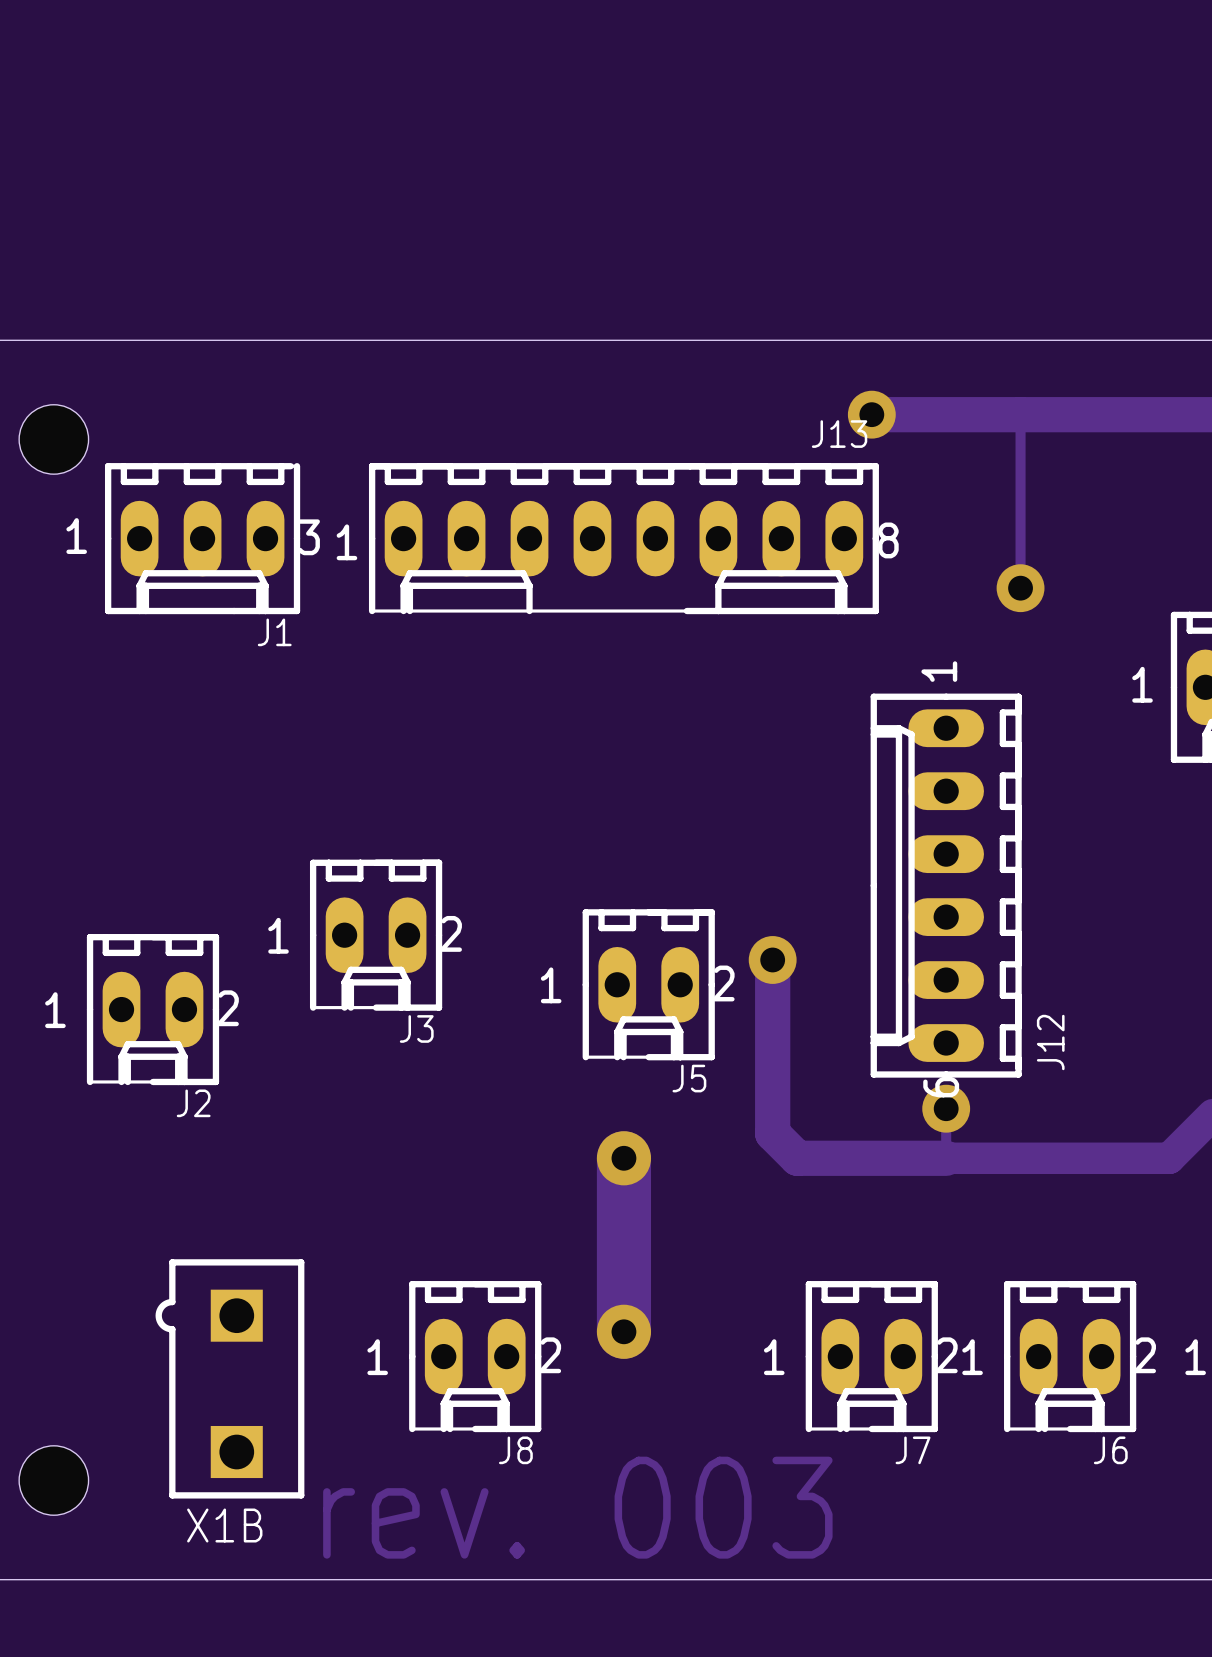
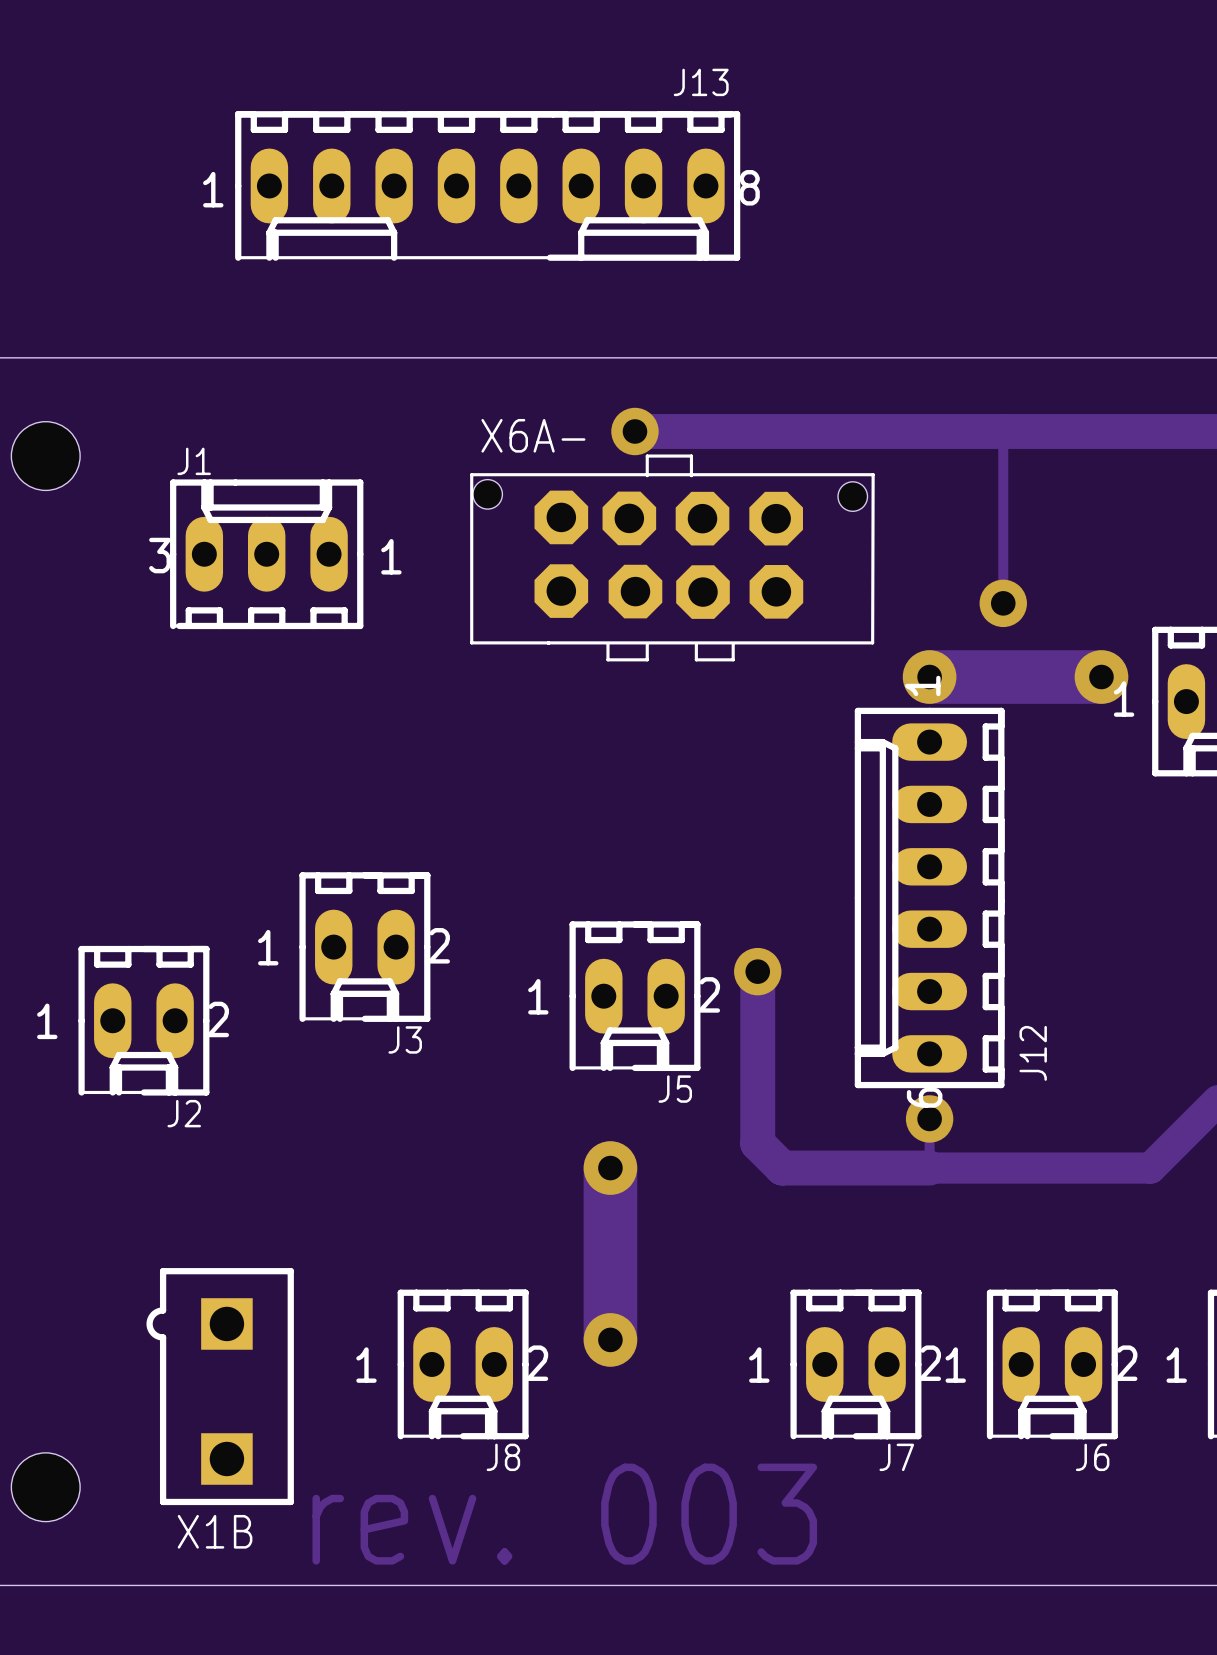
track: none -> (634, 431) (855, 431)
via: none -> (634, 431)
via: (871, 414) -> none
J1 footprint: [104, 463, 301, 615] -> [170, 479, 364, 630]
J13 position: (623, 538) -> (487, 185)
X6A-: none -> (672, 557)
J1 name position: J1 (274, 632) -> J1 (194, 461)
track: none -> (929, 677) (1101, 677)
via: none -> (929, 677)
via: none -> (1101, 677)

